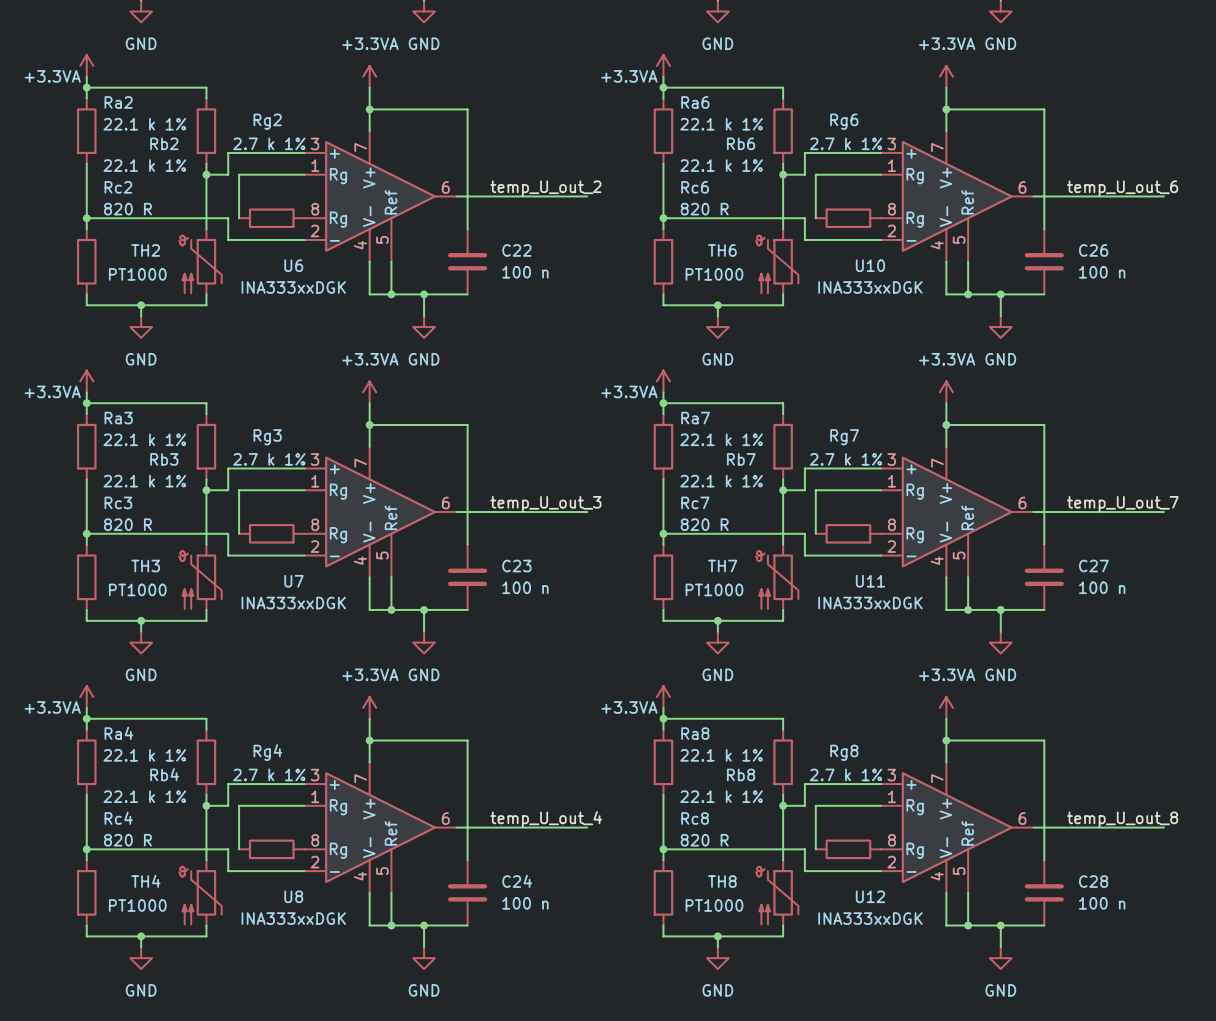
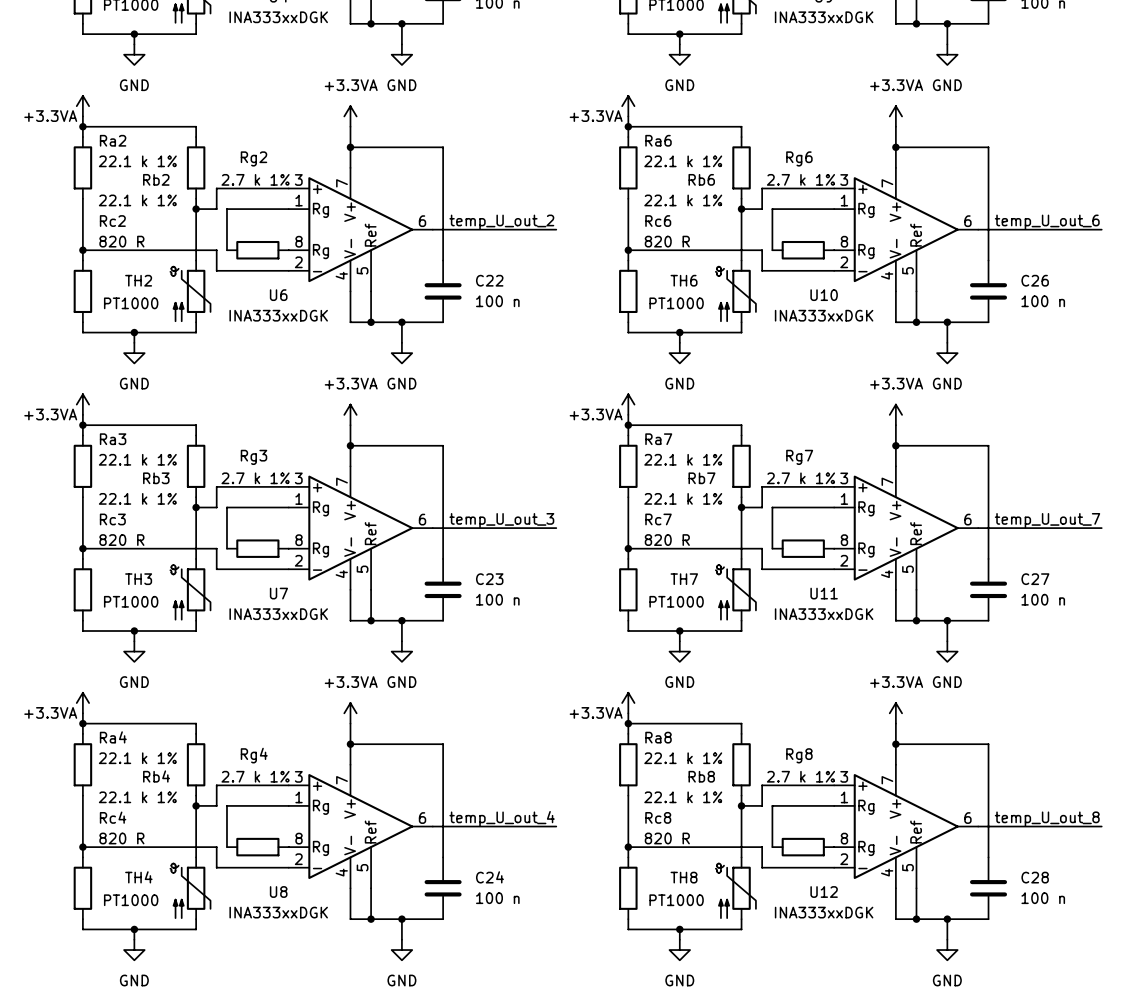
label position: temp_U_out_2 (545, 188) -> temp_U_out_2 (501, 222)
label position: temp_U_out_6 (1122, 188) -> temp_U_out_6 (1047, 222)
label position: temp_U_out_3 (545, 504) -> temp_U_out_3 (501, 520)
label position: temp_U_out_7 (1122, 504) -> temp_U_out_7 (1047, 520)
label position: temp_U_out_4 (546, 819) -> temp_U_out_4 (502, 818)
label position: temp_U_out_8 (1122, 819) -> temp_U_out_8 (1047, 819)

